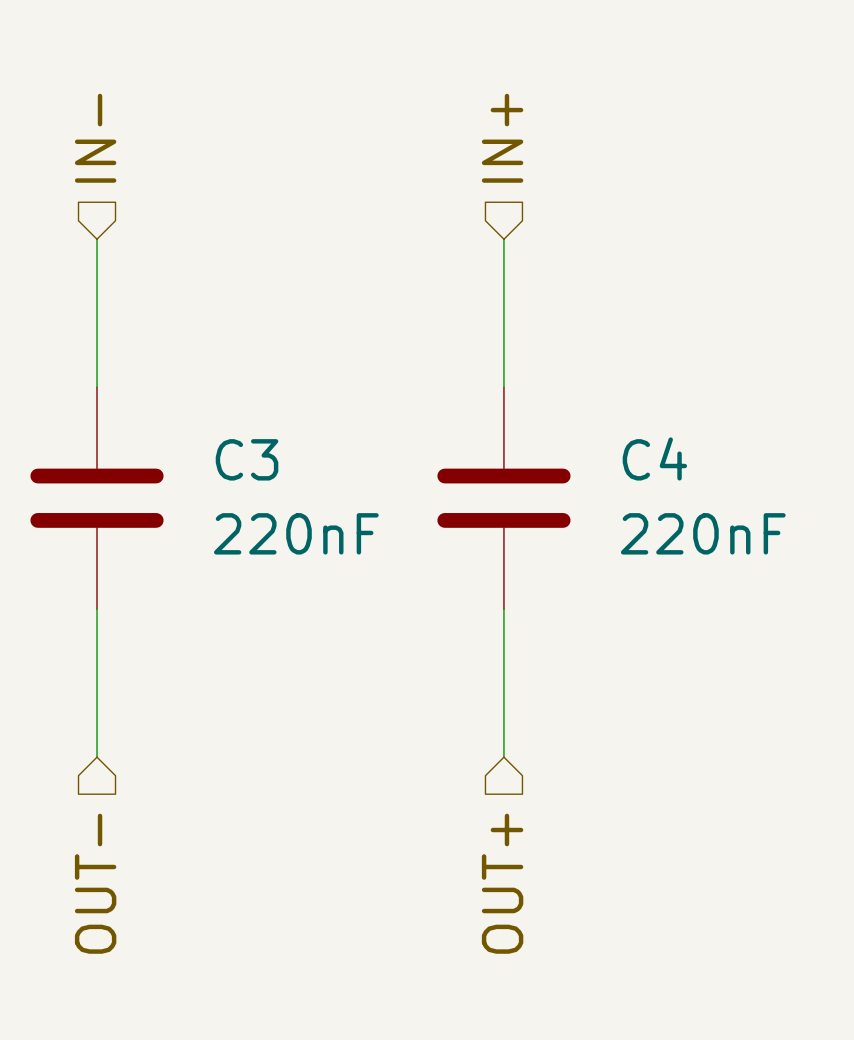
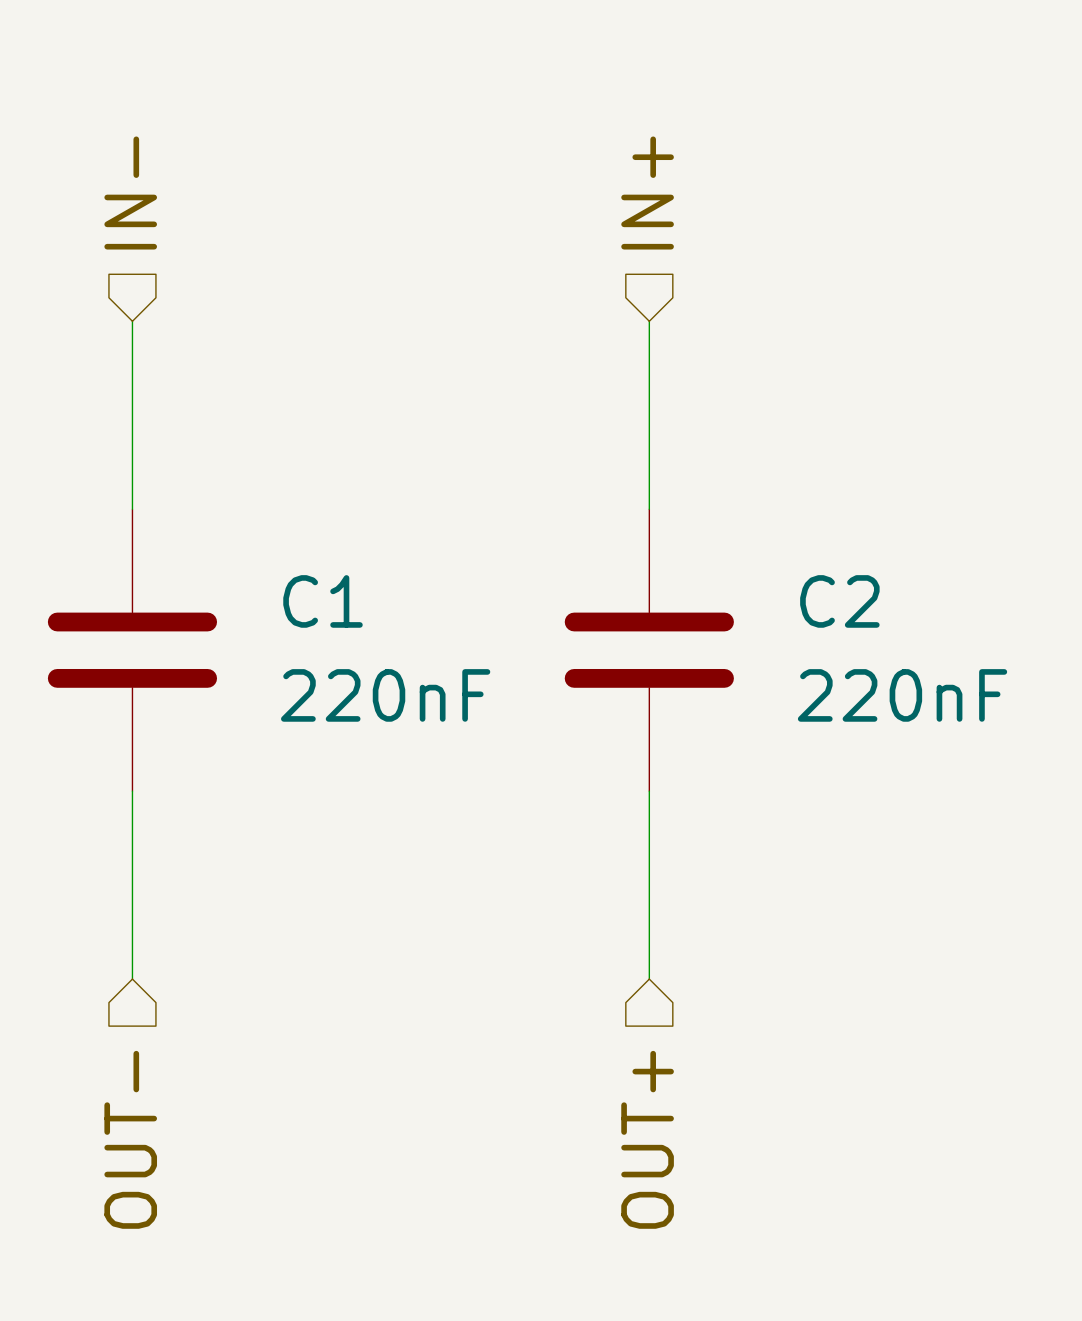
C4 name: C4 (654, 458) -> C2 (839, 601)
C3 name: C3 (247, 459) -> C1 (323, 601)

